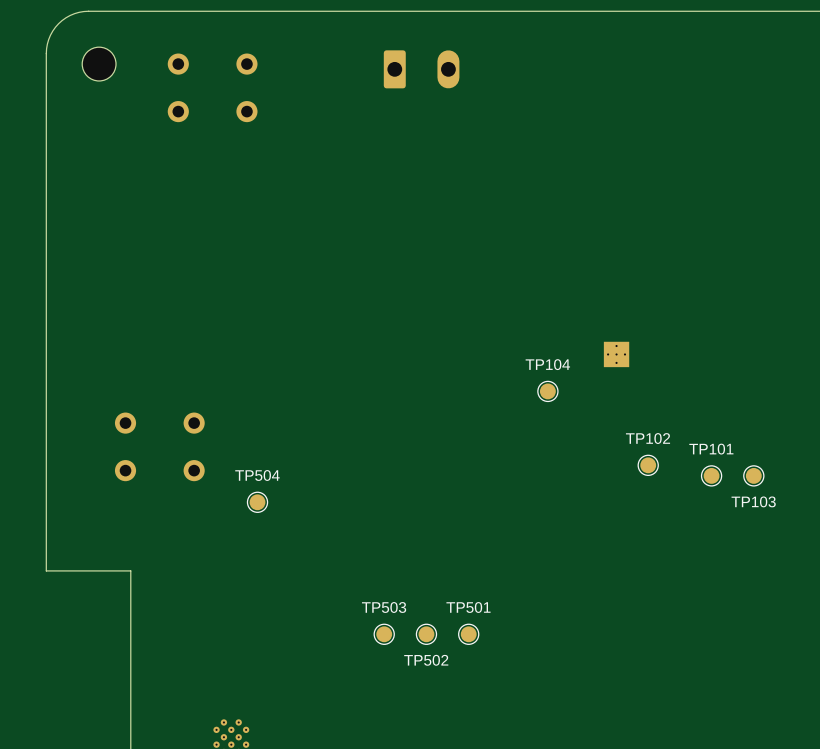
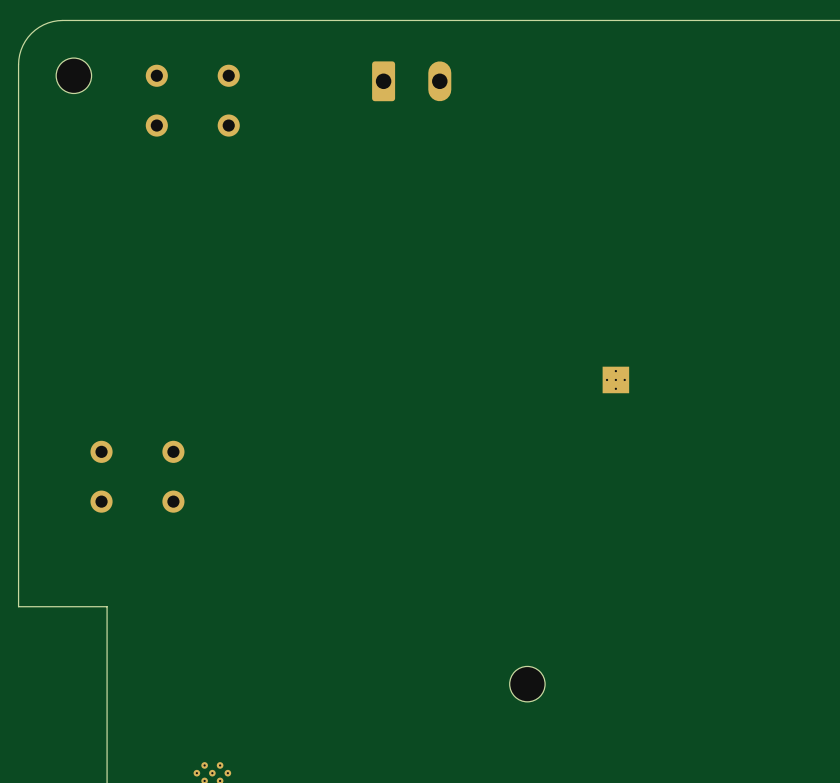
TP104: (547, 391) -> none
TP102: (648, 465) -> none
TP101: (711, 475) -> none
TP103: (753, 475) -> none
TP504: (257, 502) -> none
TP503: (384, 634) -> none
TP502: (426, 634) -> none
TP501: (468, 634) -> none
part: none -> (527, 684)

